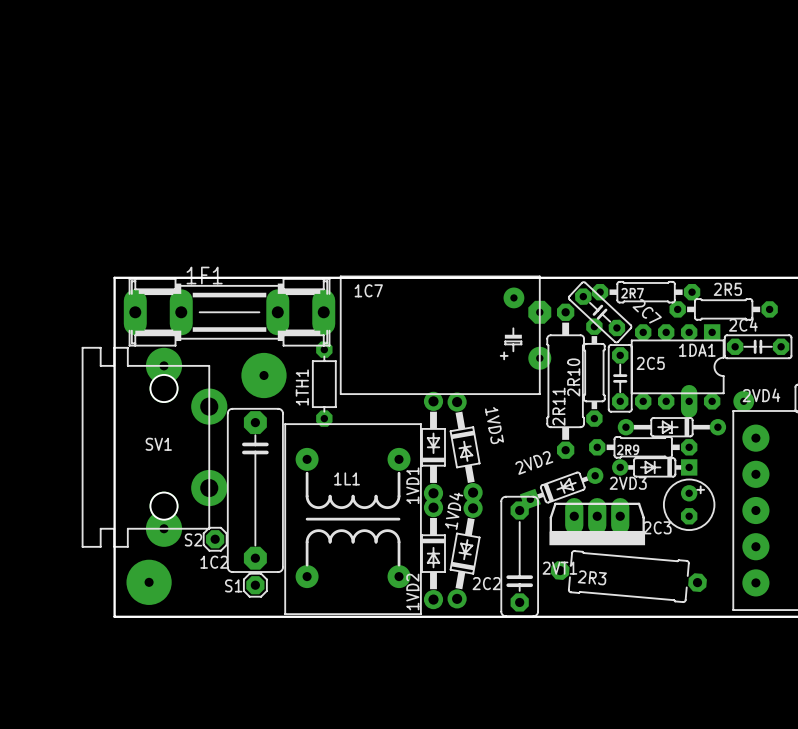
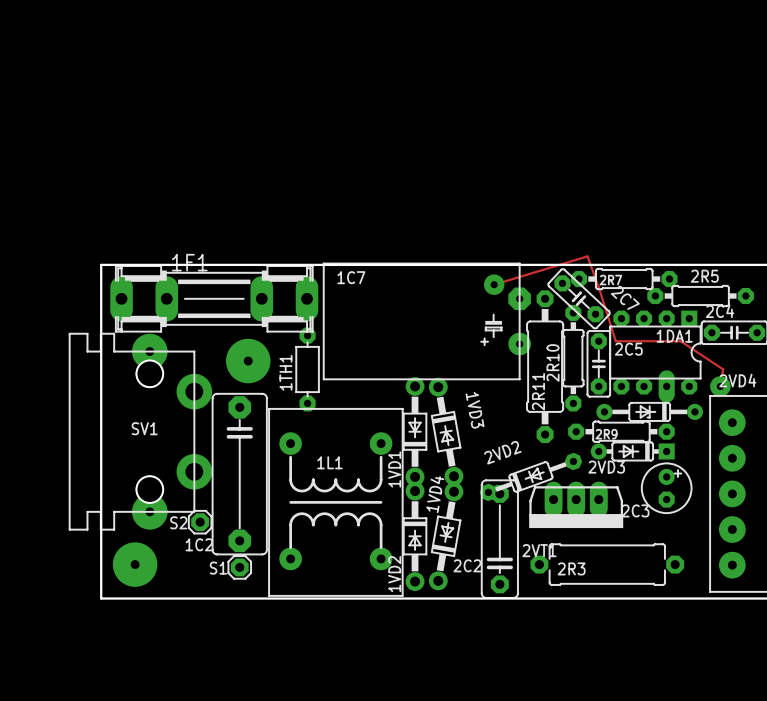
track: none -> (494, 284) (587, 256) (615, 341) (680, 341) (723, 369) (720, 386)
2VD2 footprint: [519, 467, 604, 510] -> [479, 452, 583, 502]
2R3 rotation: 0° (628, 576) -> 5° counterclockwise (607, 564)

